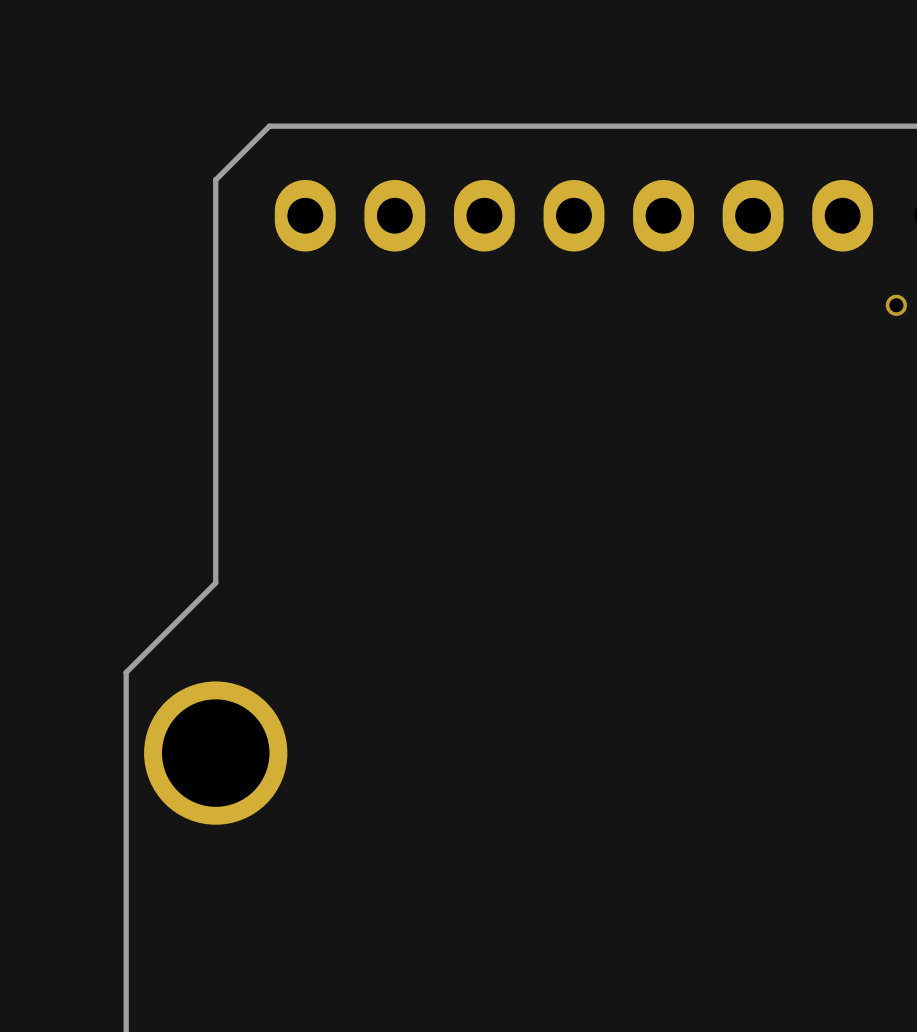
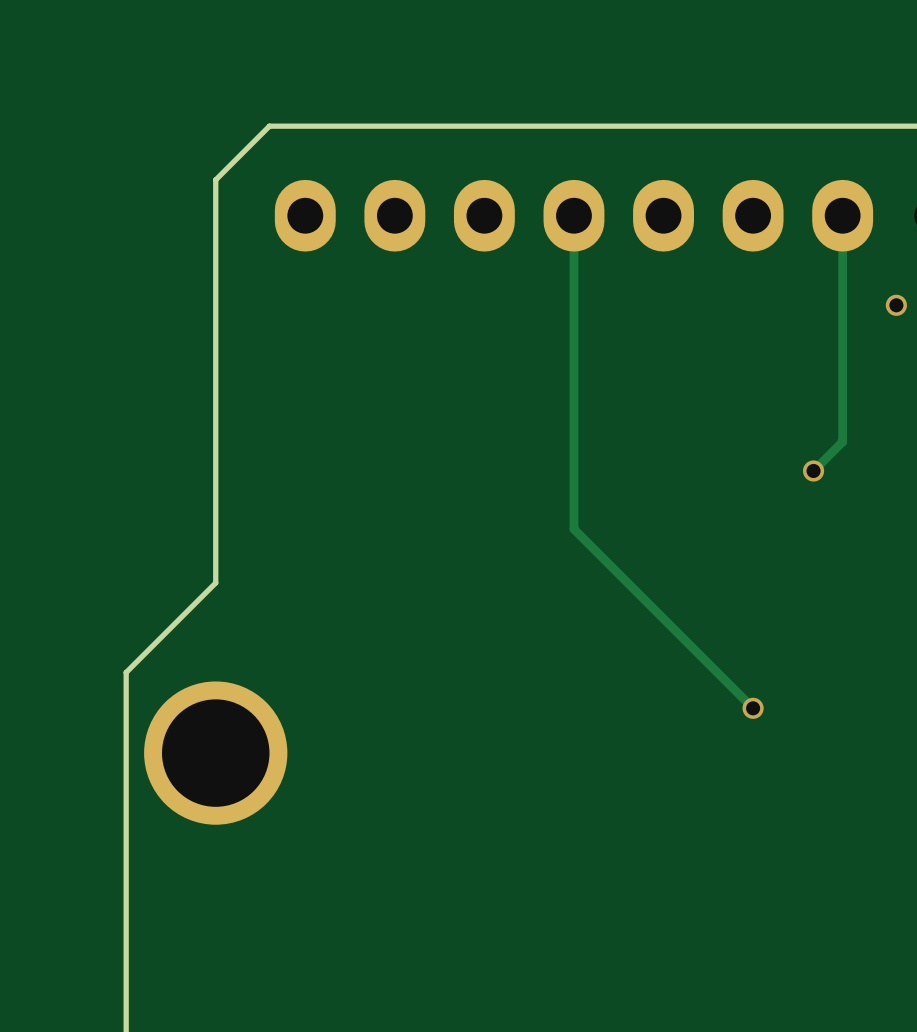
track: none -> (573, 215) (573, 529) (753, 708)
track: none -> (842, 215) (842, 441) (813, 470)
via: none -> (813, 470)
via: none -> (753, 708)

